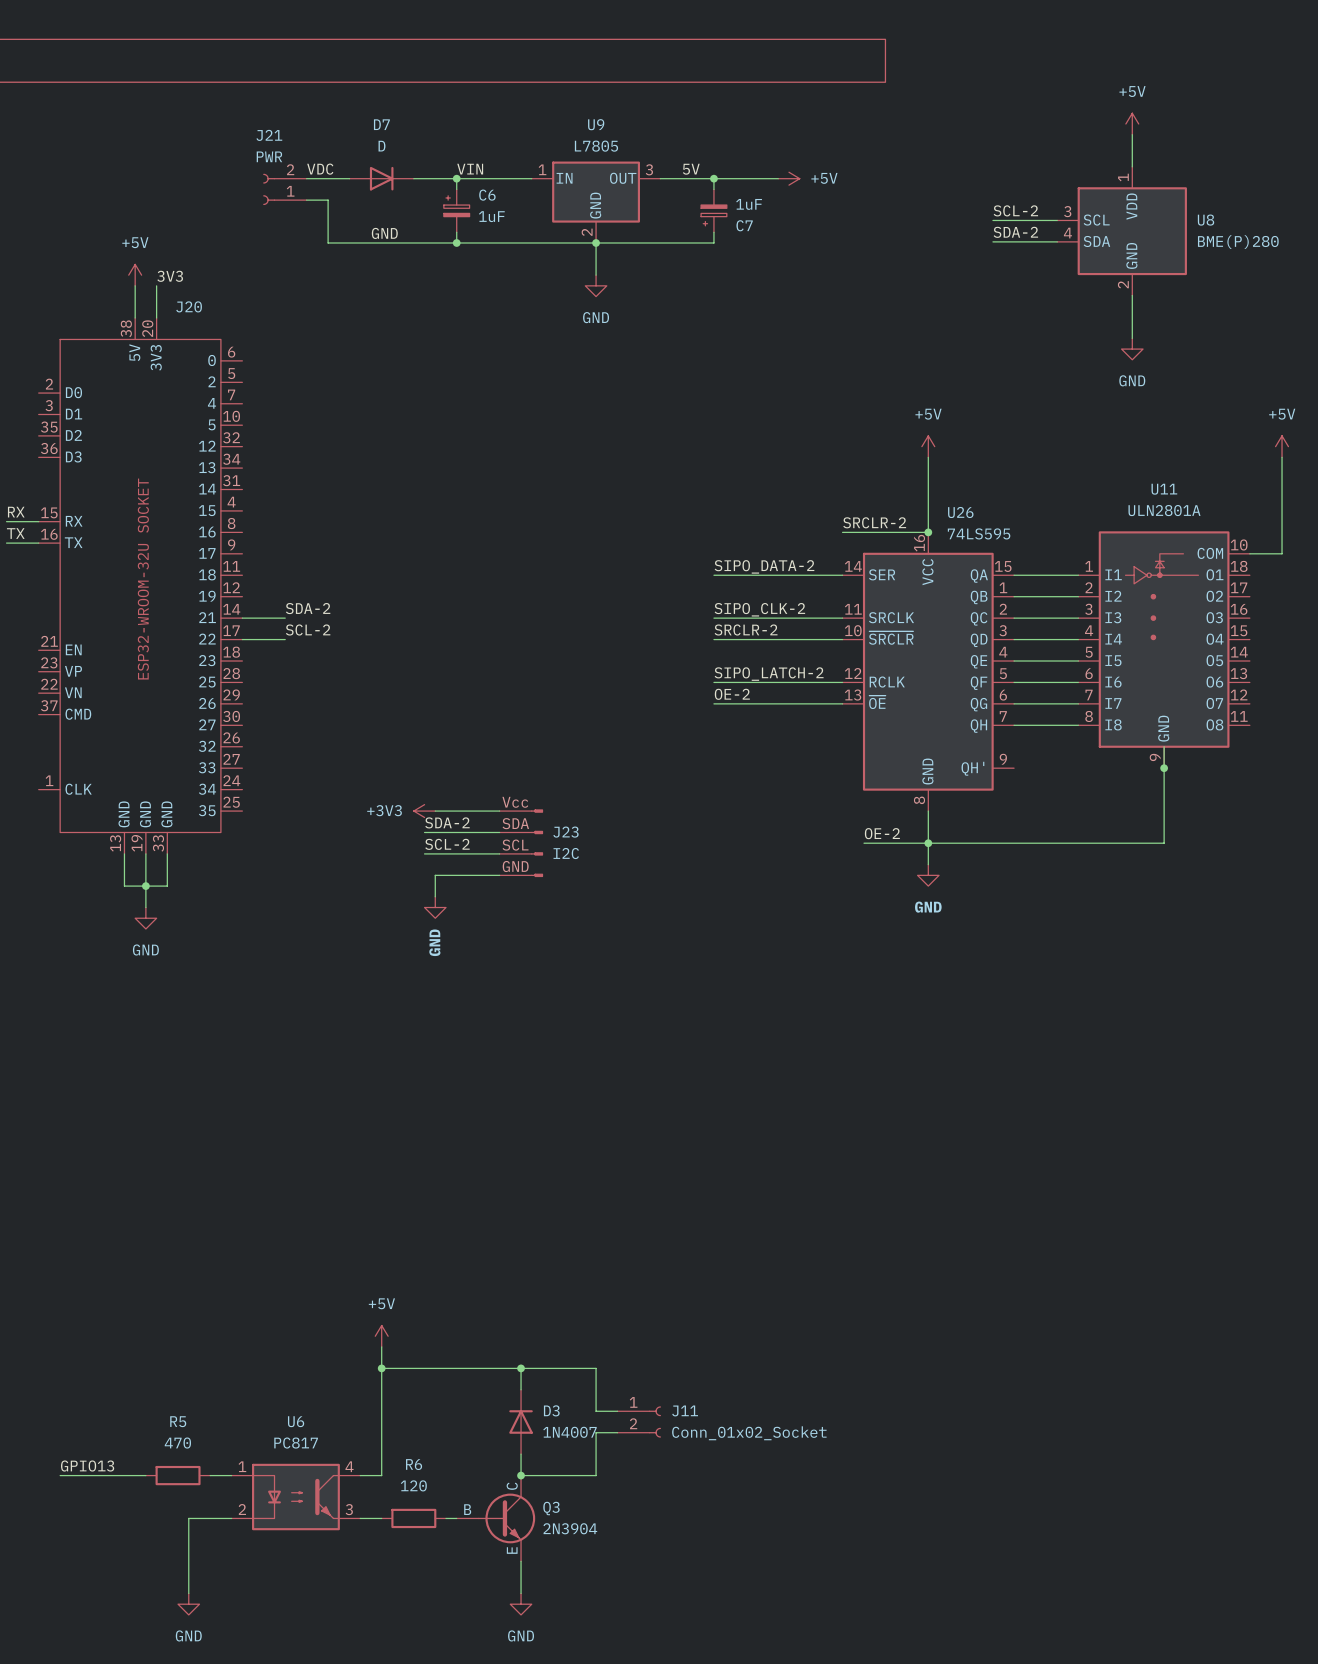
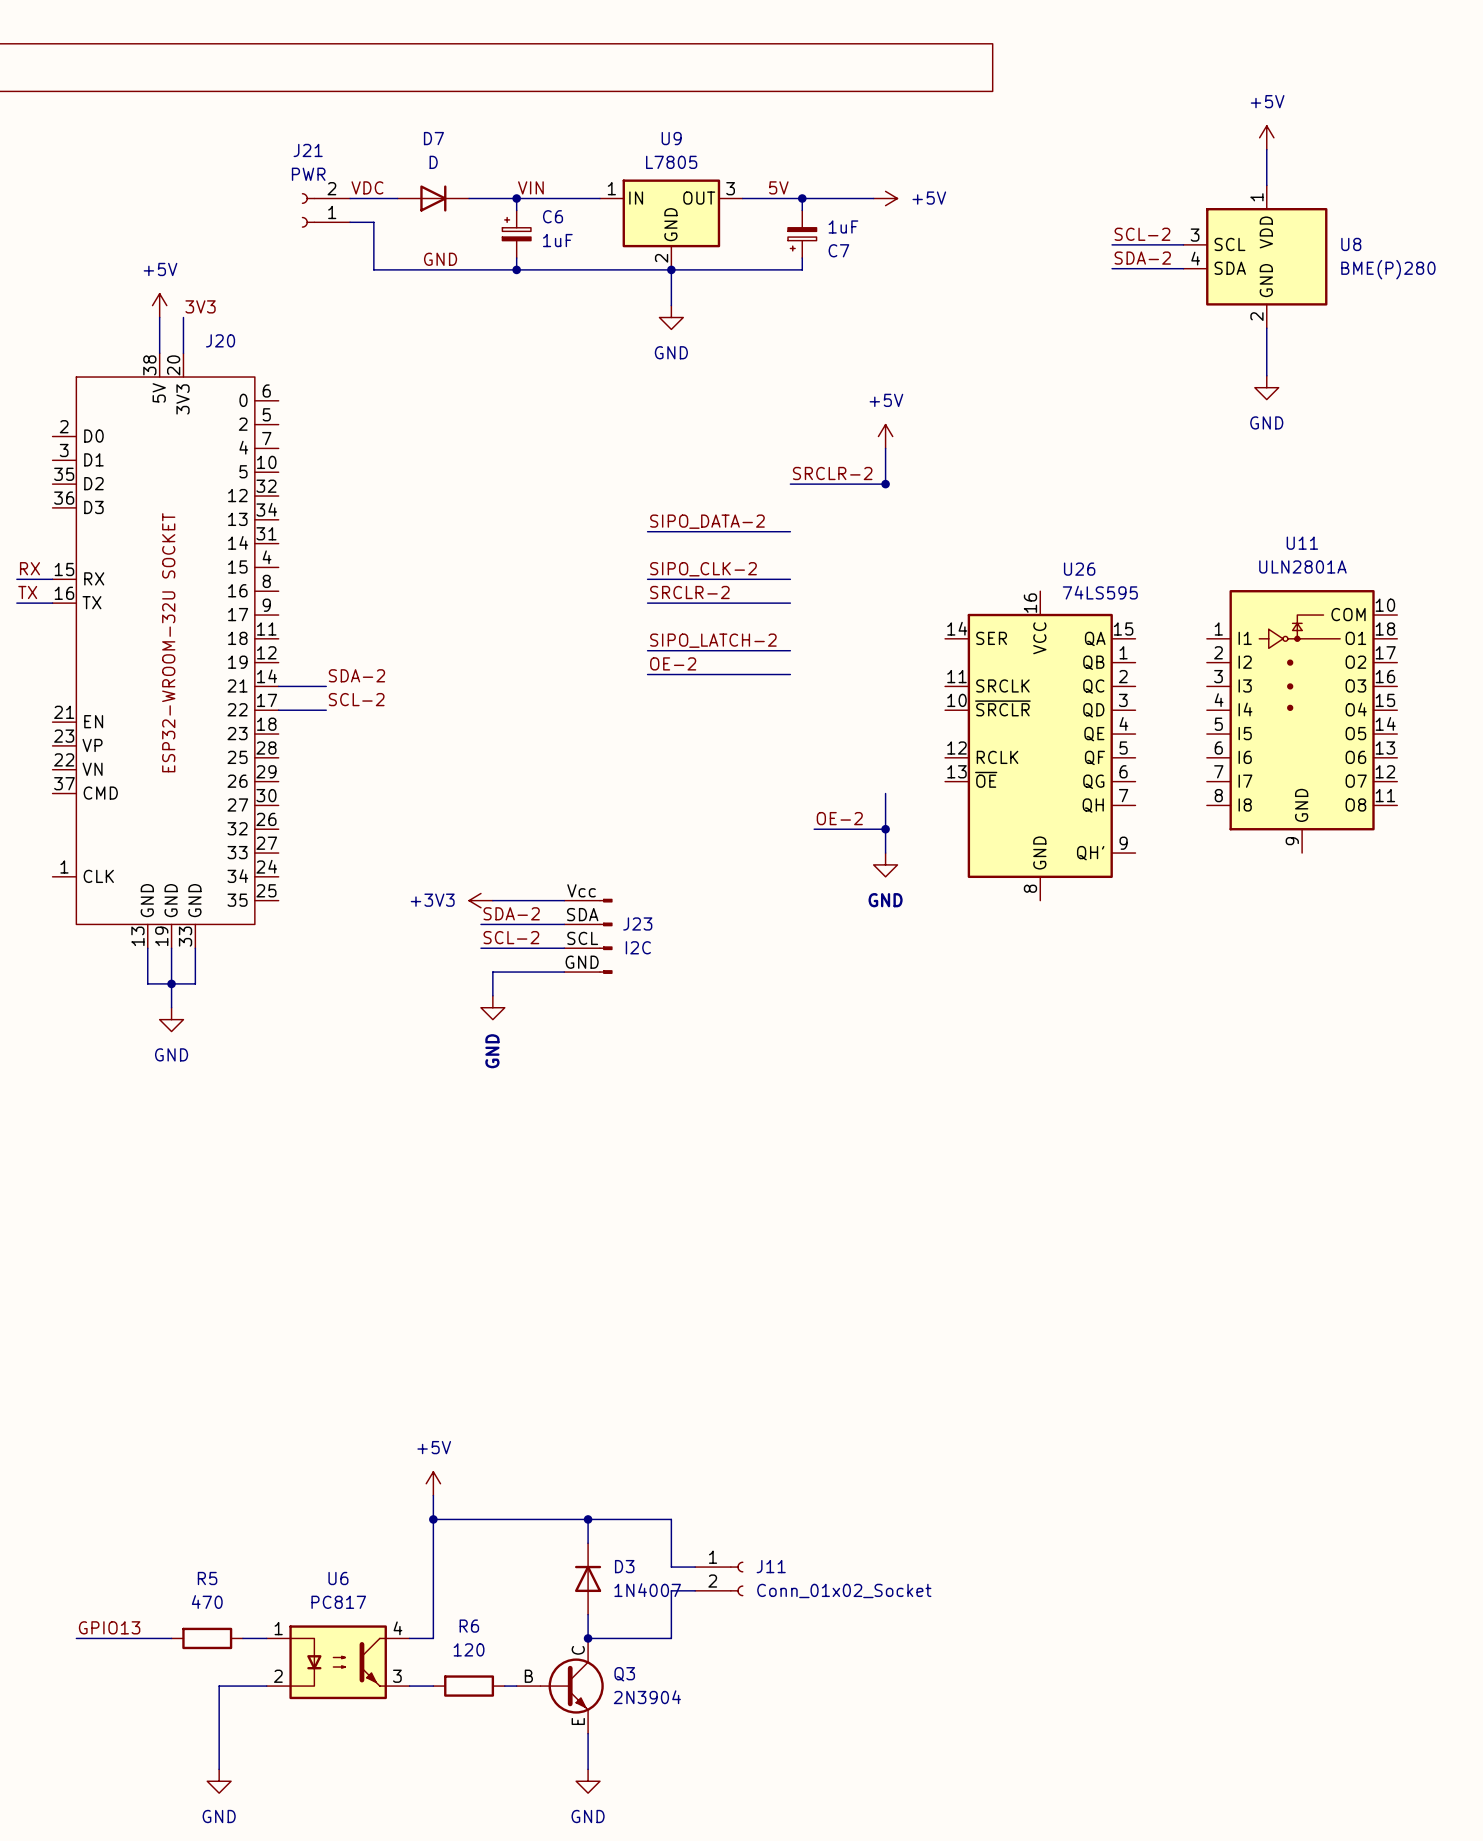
wire: none -> (885, 448) (885, 484) (790, 484)
label: none -> SRCLR-2 (832, 473)
junction: none -> (885, 484)
power symbol position: +5V (928, 446) -> +5V (885, 436)
power symbol: +5V (1282, 446) -> none
wire: (928, 457) (928, 532) (842, 532) -> none
wire: (1282, 457) (1282, 553) (1249, 553) -> none
label: SRCLR-2 (874, 522) -> none
junction: (928, 532) -> none
label: none -> SRCLR-2 (689, 592)
label position: SIPO_DATA-2 (764, 566) -> SIPO_DATA-2 (707, 521)
wire: (713, 575) (842, 575) -> (647, 531) (790, 531)
wire: (1014, 575) (1078, 575) -> none
wire: (1014, 596) (1078, 596) -> none
label: none -> OE-2 (673, 663)
label position: SIPO_CLK-2 (759, 609) -> SIPO_CLK-2 (703, 569)
wire: (713, 618) (842, 618) -> (647, 579) (790, 579)
wire: (1014, 618) (1078, 618) -> none
label: SRCLR-2 (746, 630) -> none
wire: (713, 639) (842, 639) -> (647, 603) (790, 603)
wire: (1014, 639) (1078, 639) -> none
wire: (1014, 661) (1078, 661) -> none
label position: SIPO_LATCH-2 (769, 674) -> SIPO_LATCH-2 (713, 640)
wire: (713, 682) (842, 682) -> (647, 650) (790, 650)
wire: (1014, 682) (1078, 682) -> none
label position: OE-2 (732, 694) -> OE-2 (839, 818)
wire: (713, 703) (842, 703) -> (647, 674) (790, 674)
wire: (1014, 703) (1078, 703) -> none
wire: (1014, 725) (1078, 725) -> none
wire: none -> (814, 829) (885, 829)
junction: none -> (885, 829)
wire: (1164, 746) (1164, 843) (864, 843) -> none
junction: (1164, 768) -> none
wire: (928, 811) (928, 864) -> (885, 793) (885, 853)
label: OE-2 (882, 833) -> none
junction: (928, 843) -> none
power symbol position: GND (928, 875) -> GND (885, 864)

